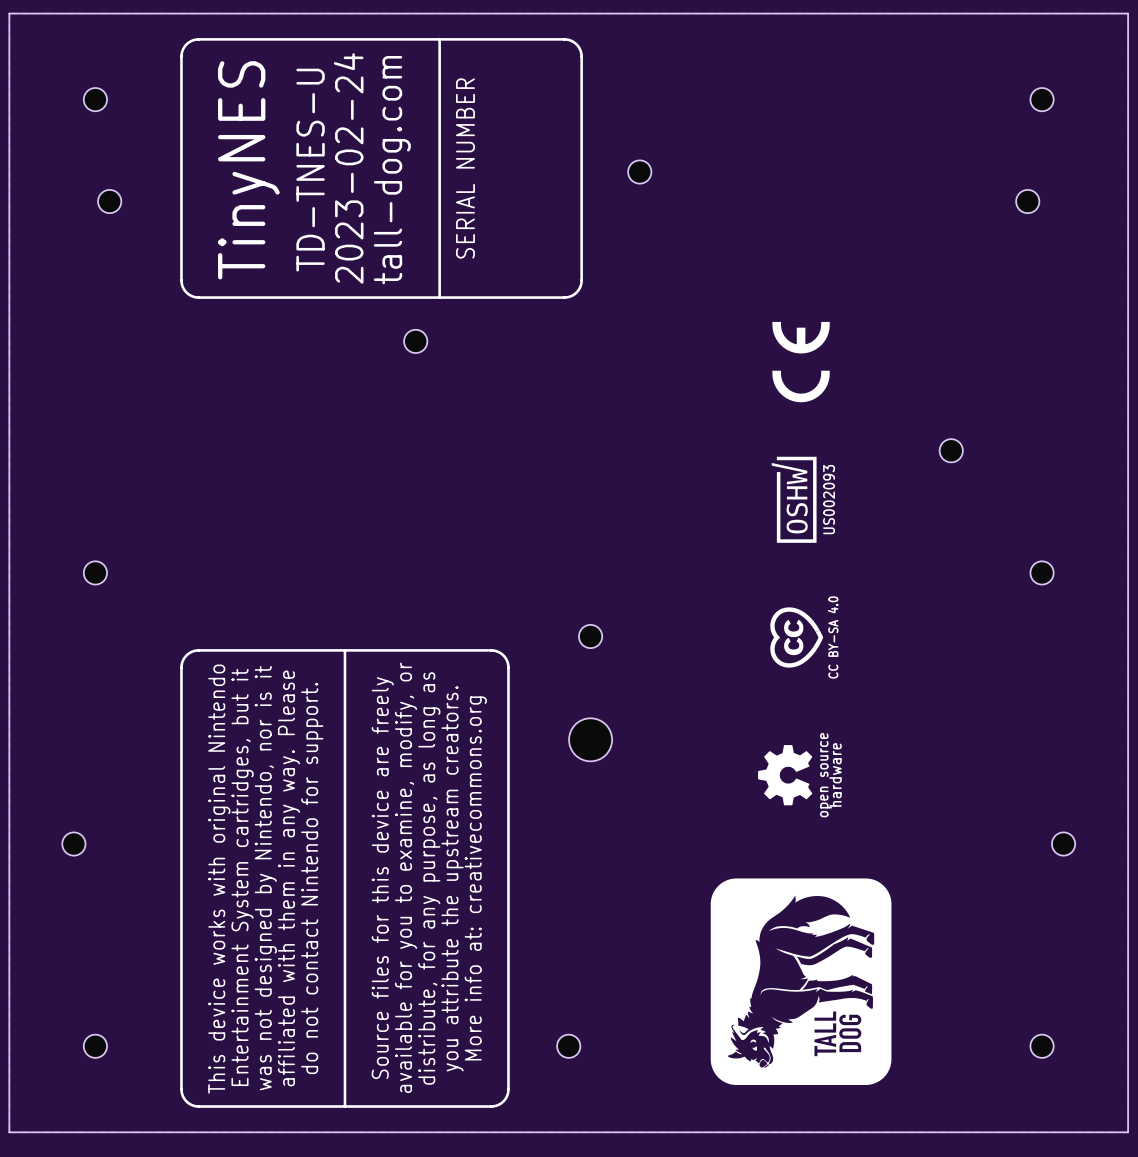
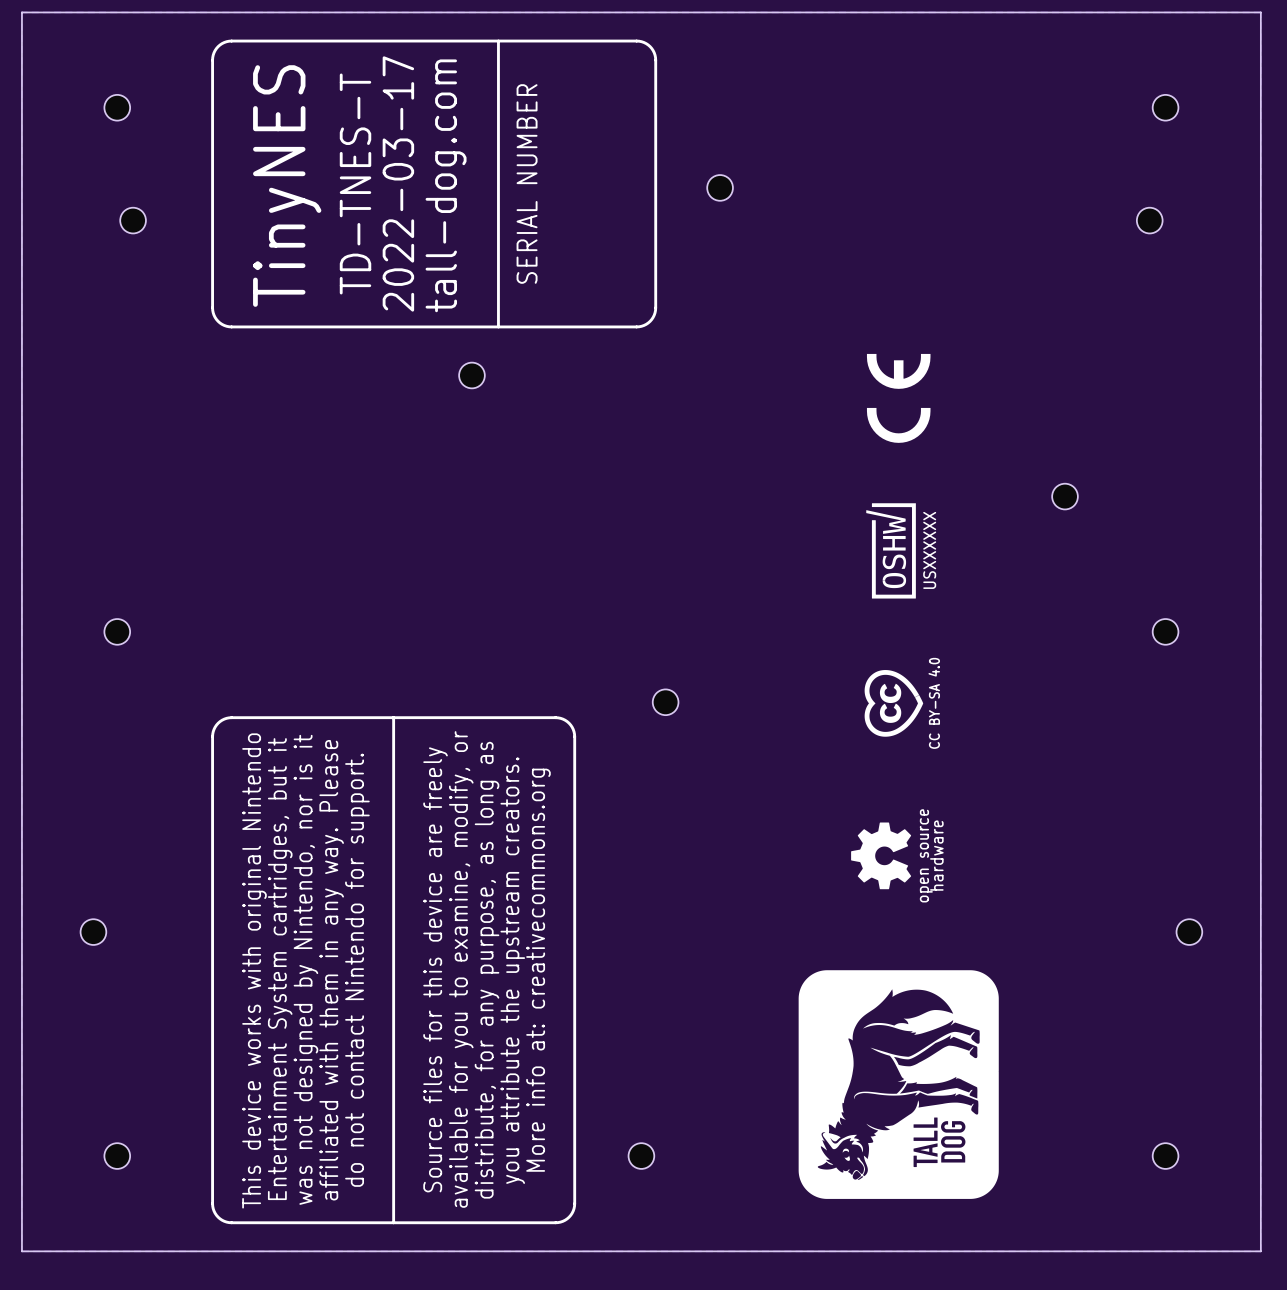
text: 2023-02-24 (348, 168) -> 2022-03-17 (398, 183)
text: TD-TNES-U (310, 170) -> TD-TNES-T (355, 183)
drawing shape: [771, 456, 835, 543] -> [866, 503, 936, 599]
hole: (590, 739) -> none

